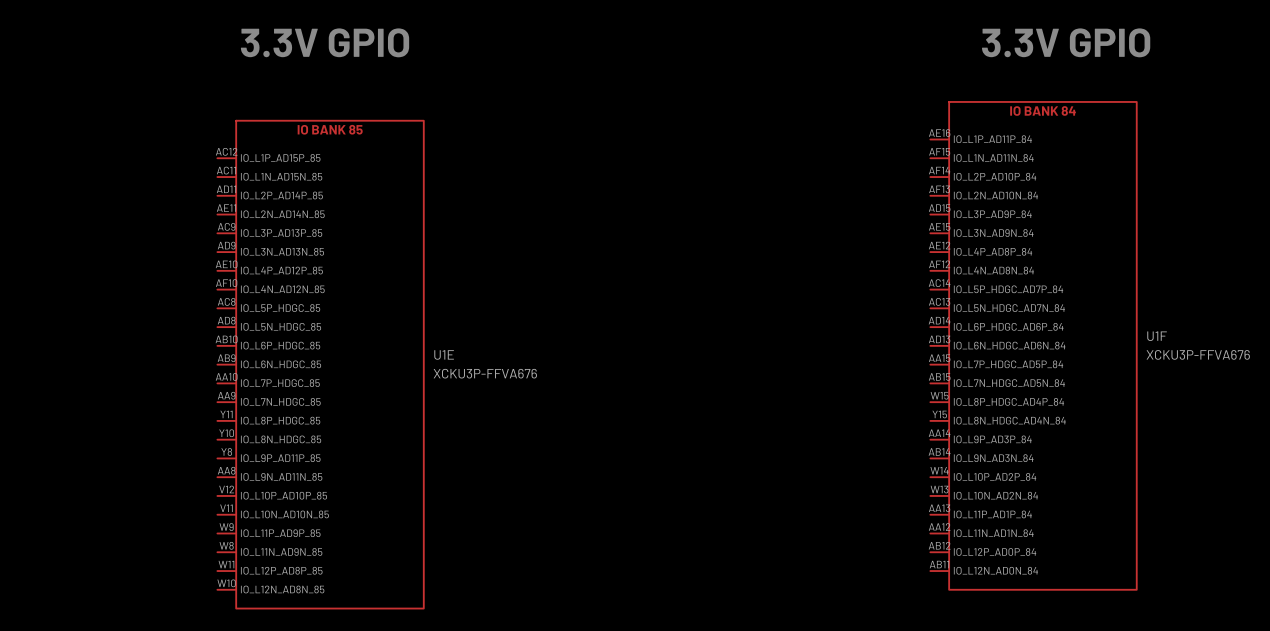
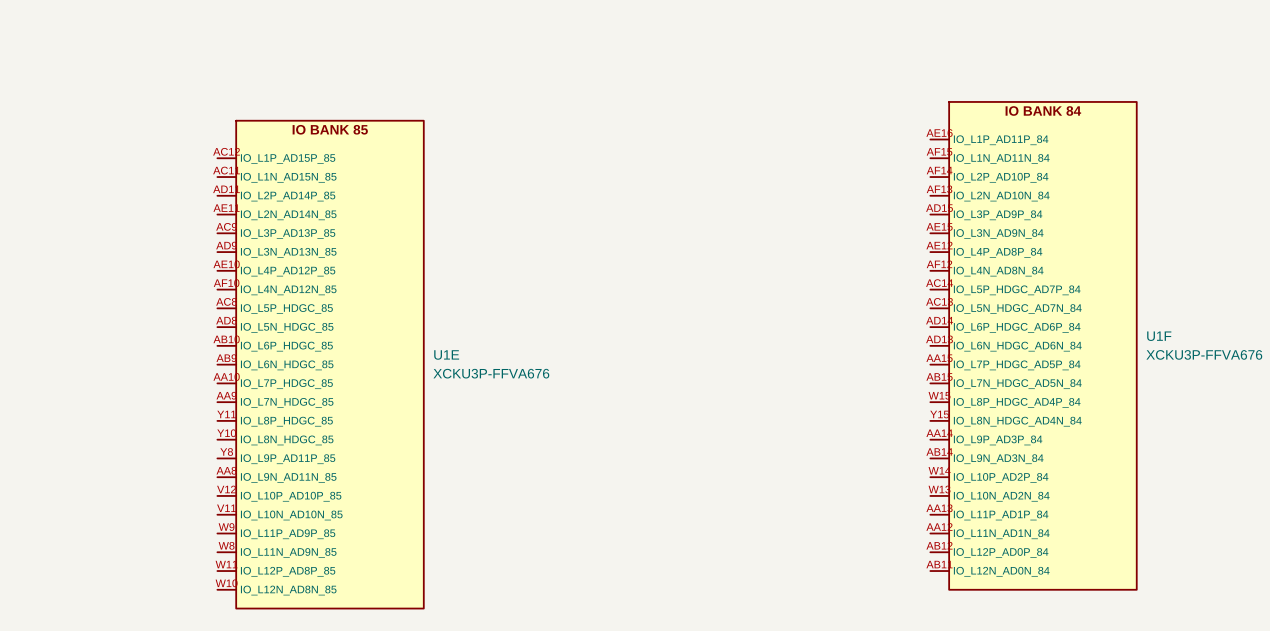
text: 3.3V GPIO (325, 42) -> none
text: 3.3V GPIO (1066, 42) -> none

